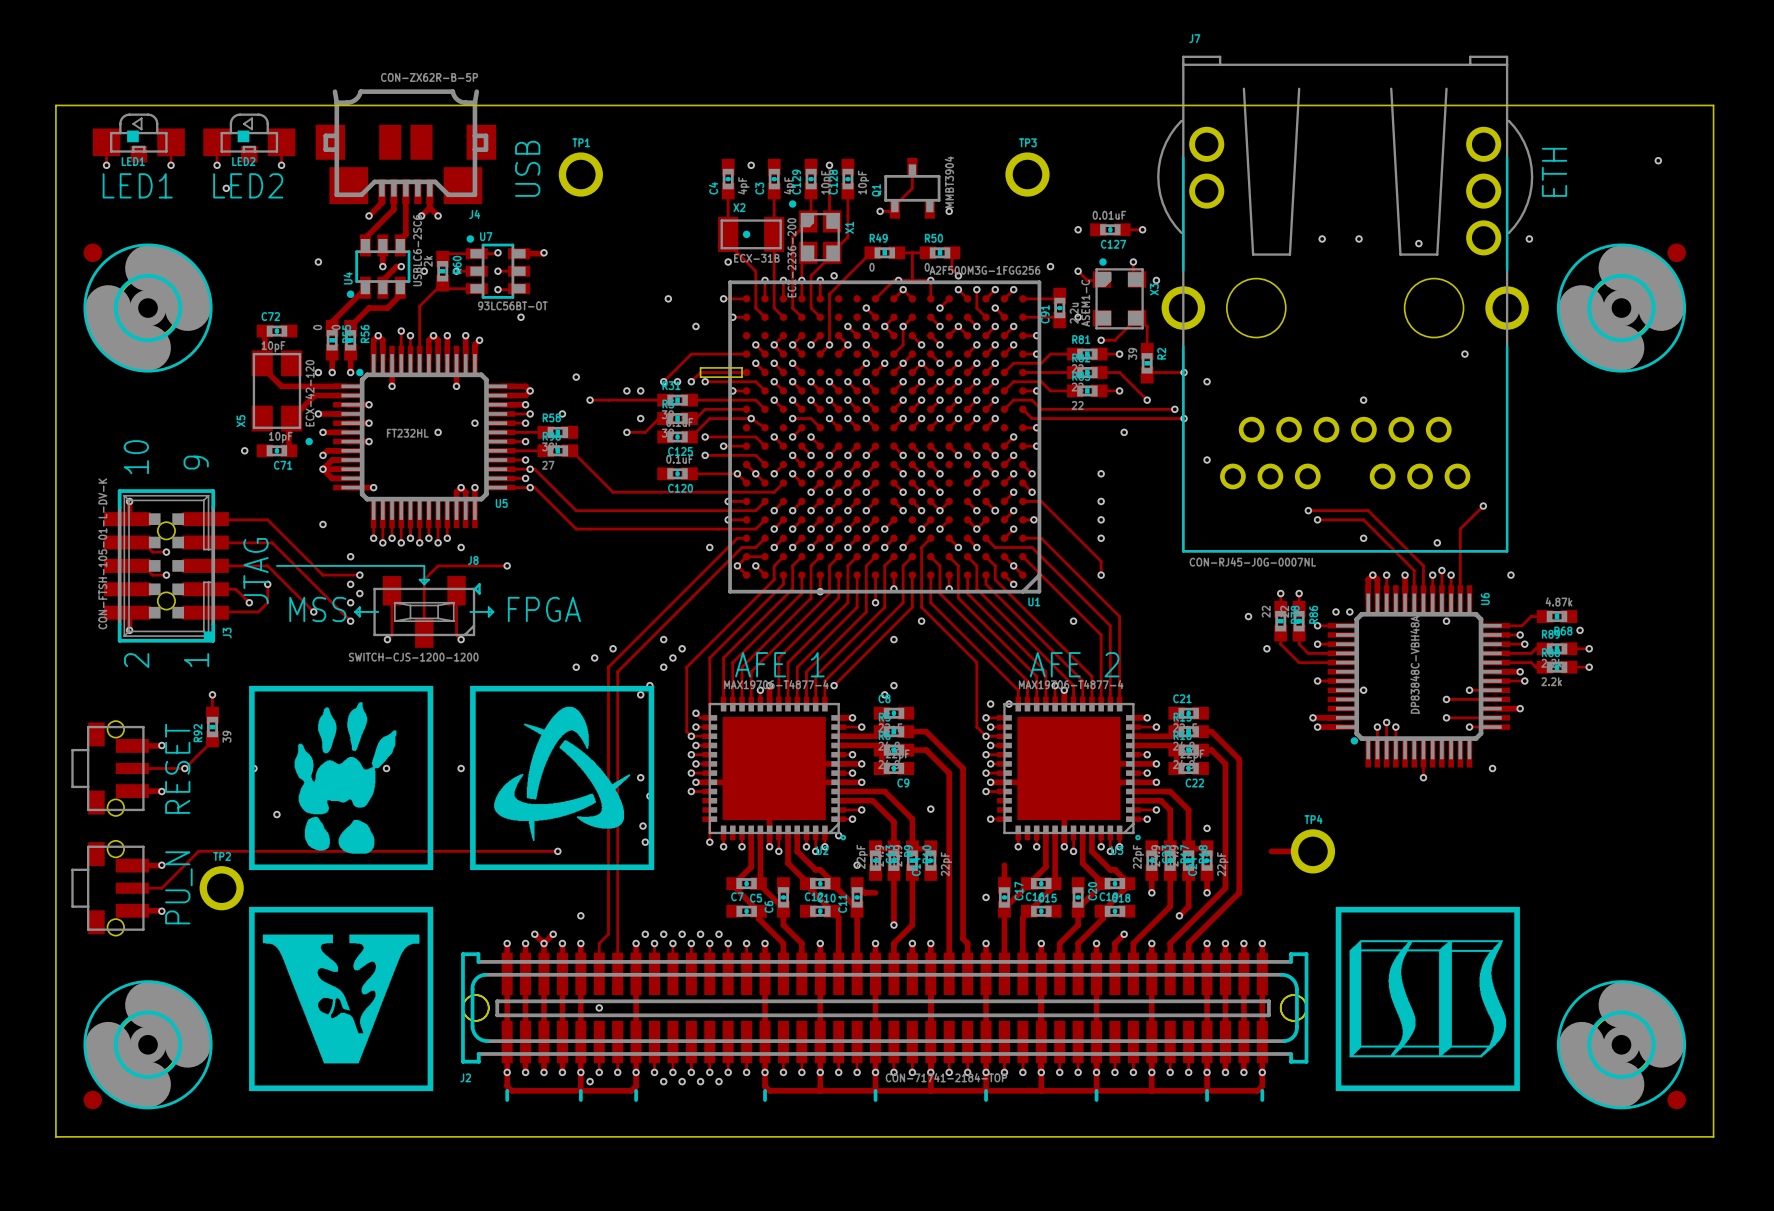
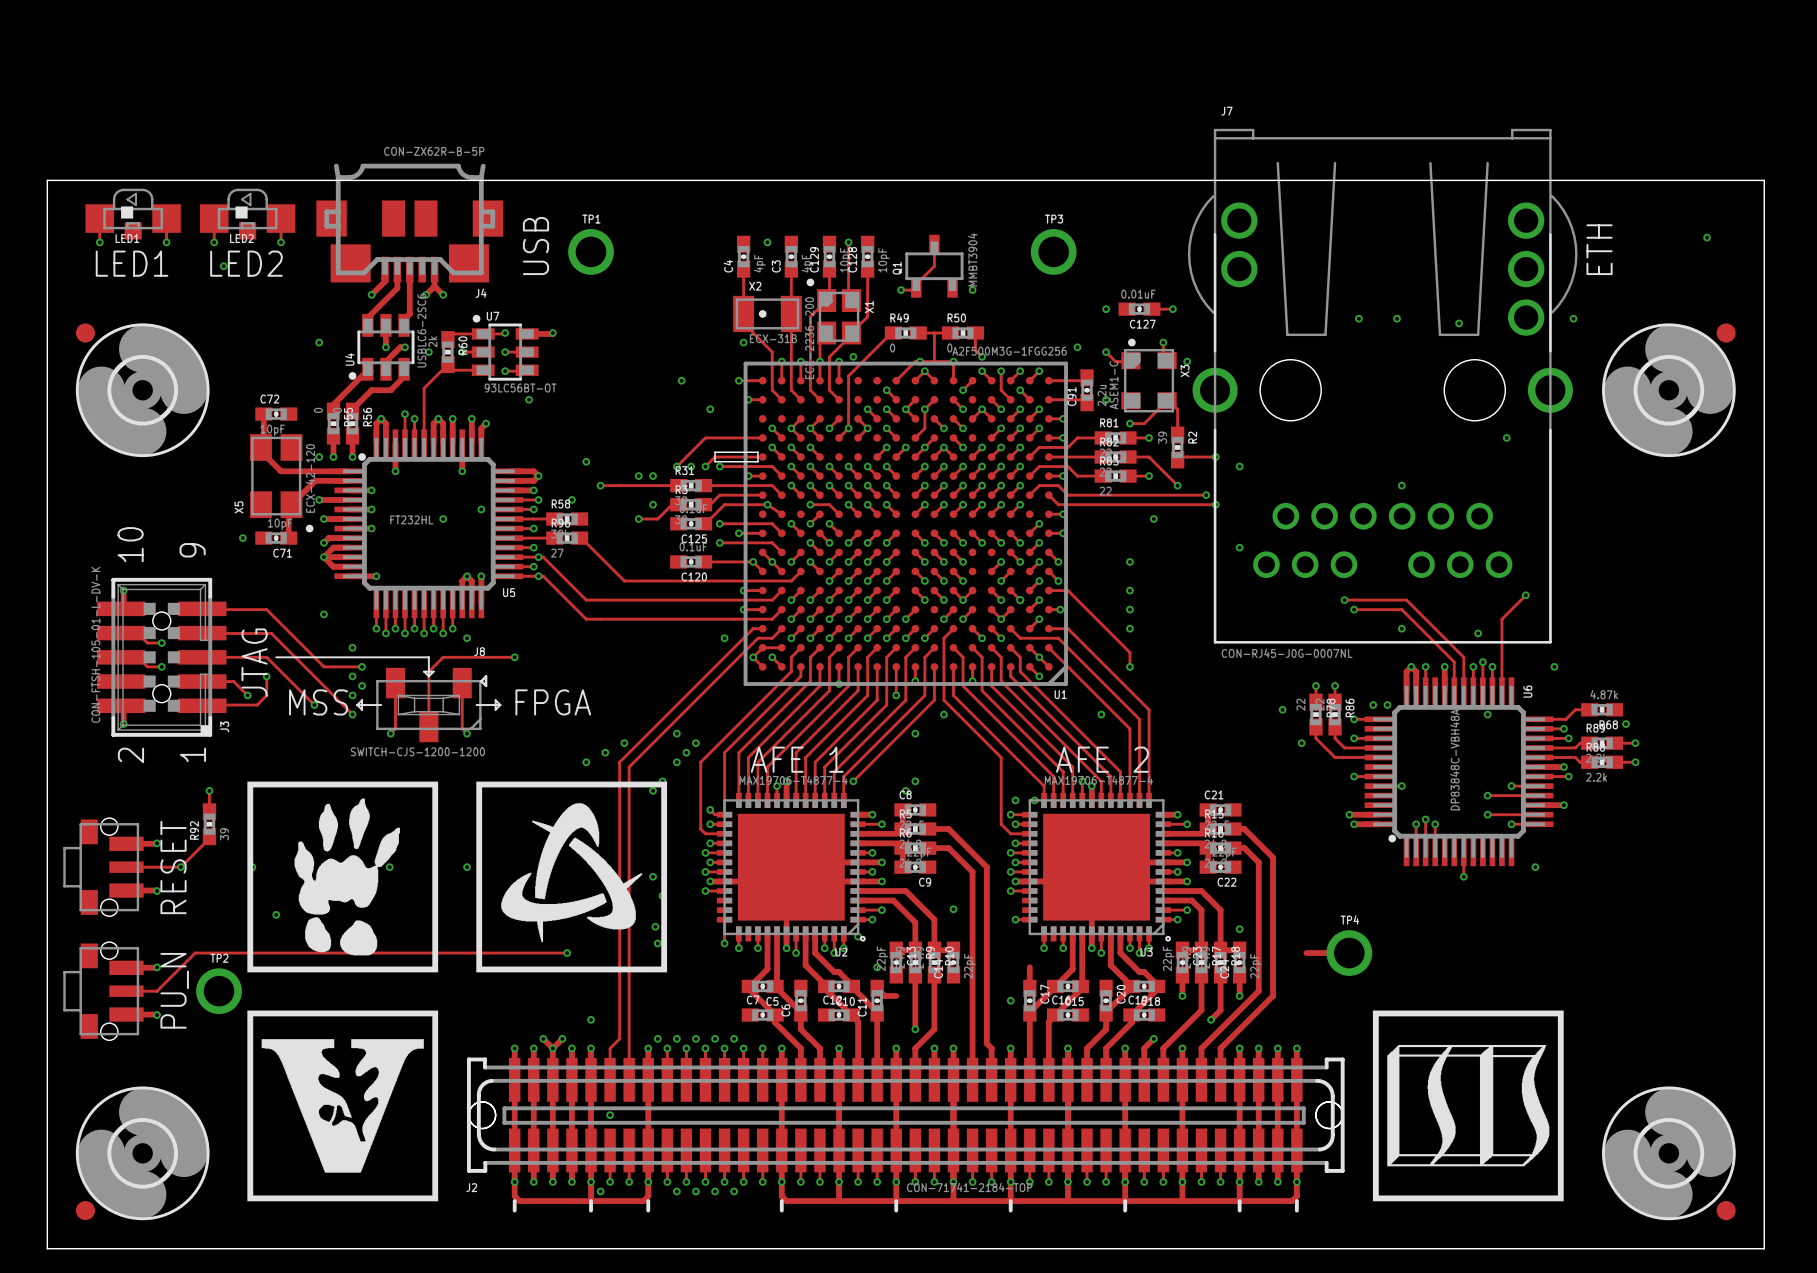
via: (691, 736) -> none
via: (986, 736) -> none

